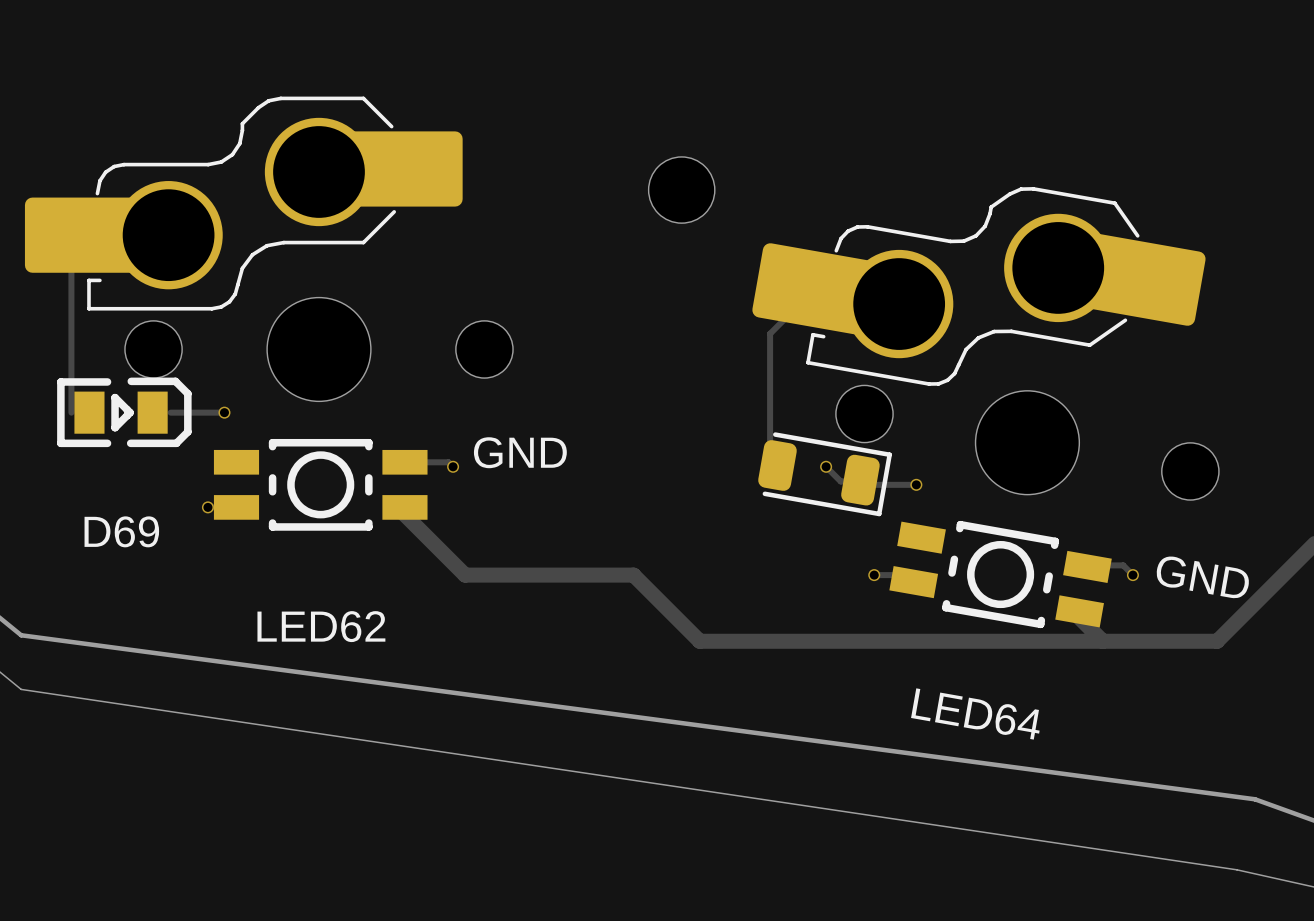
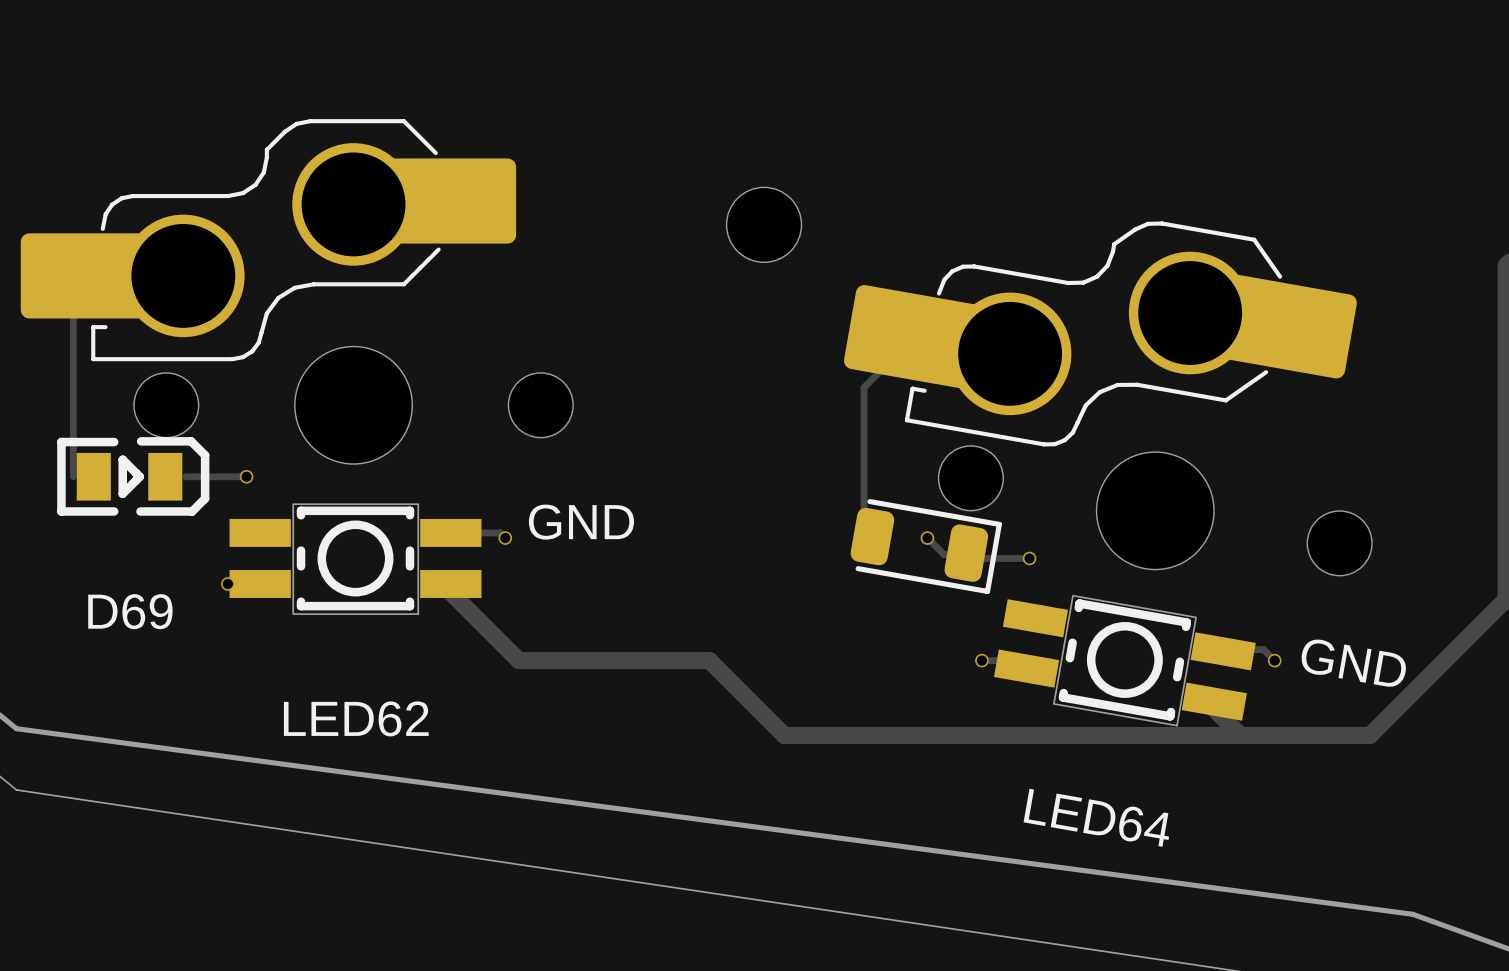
LED62 footprint: [213, 438, 428, 531] -> [229, 503, 482, 615]
LED64 footprint: [889, 520, 1112, 629] -> [993, 594, 1256, 727]

